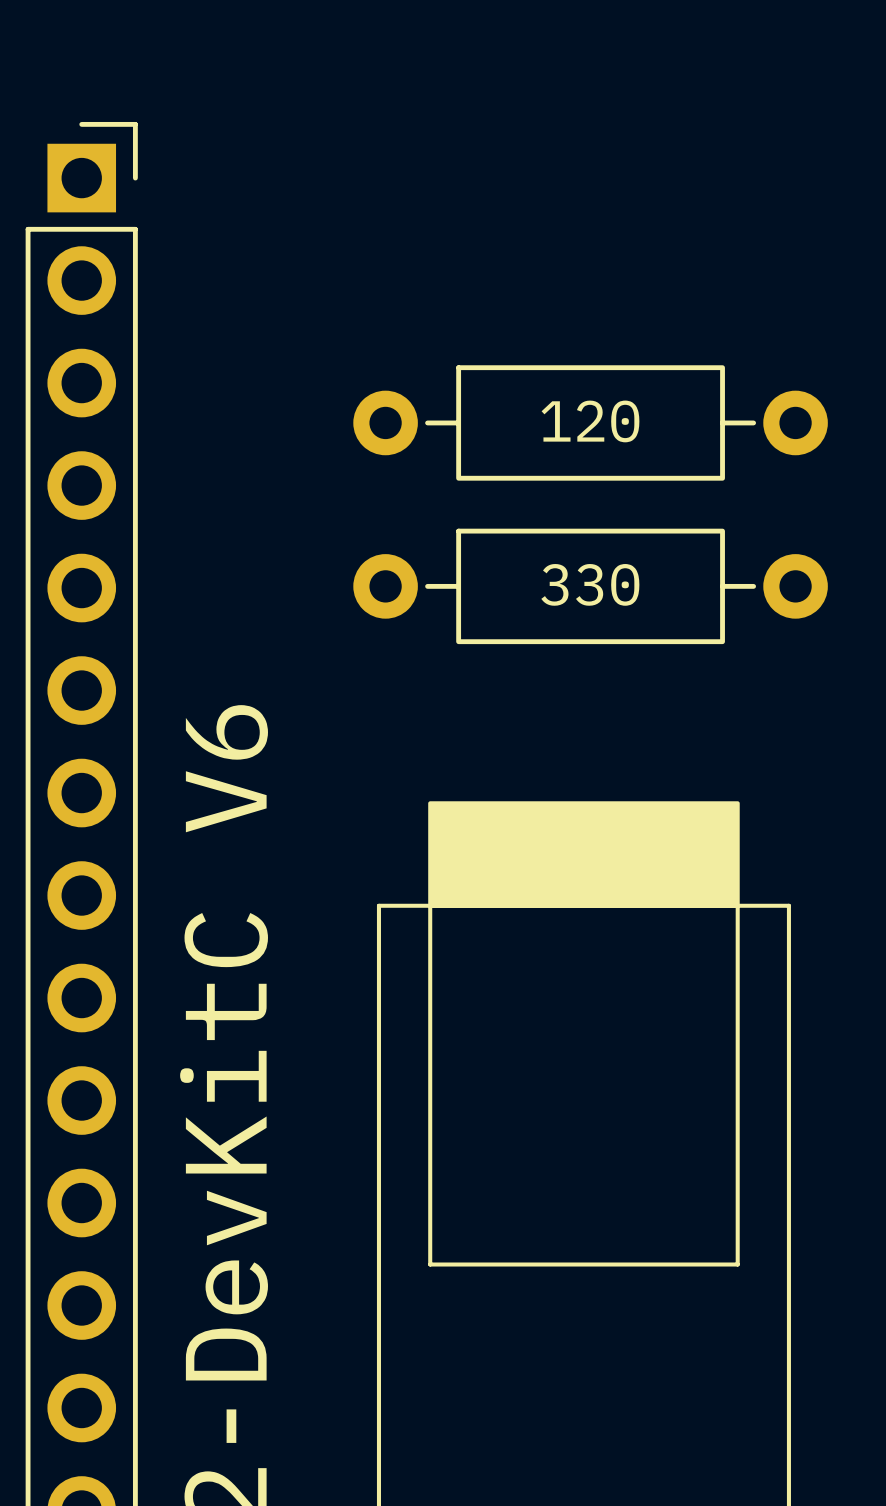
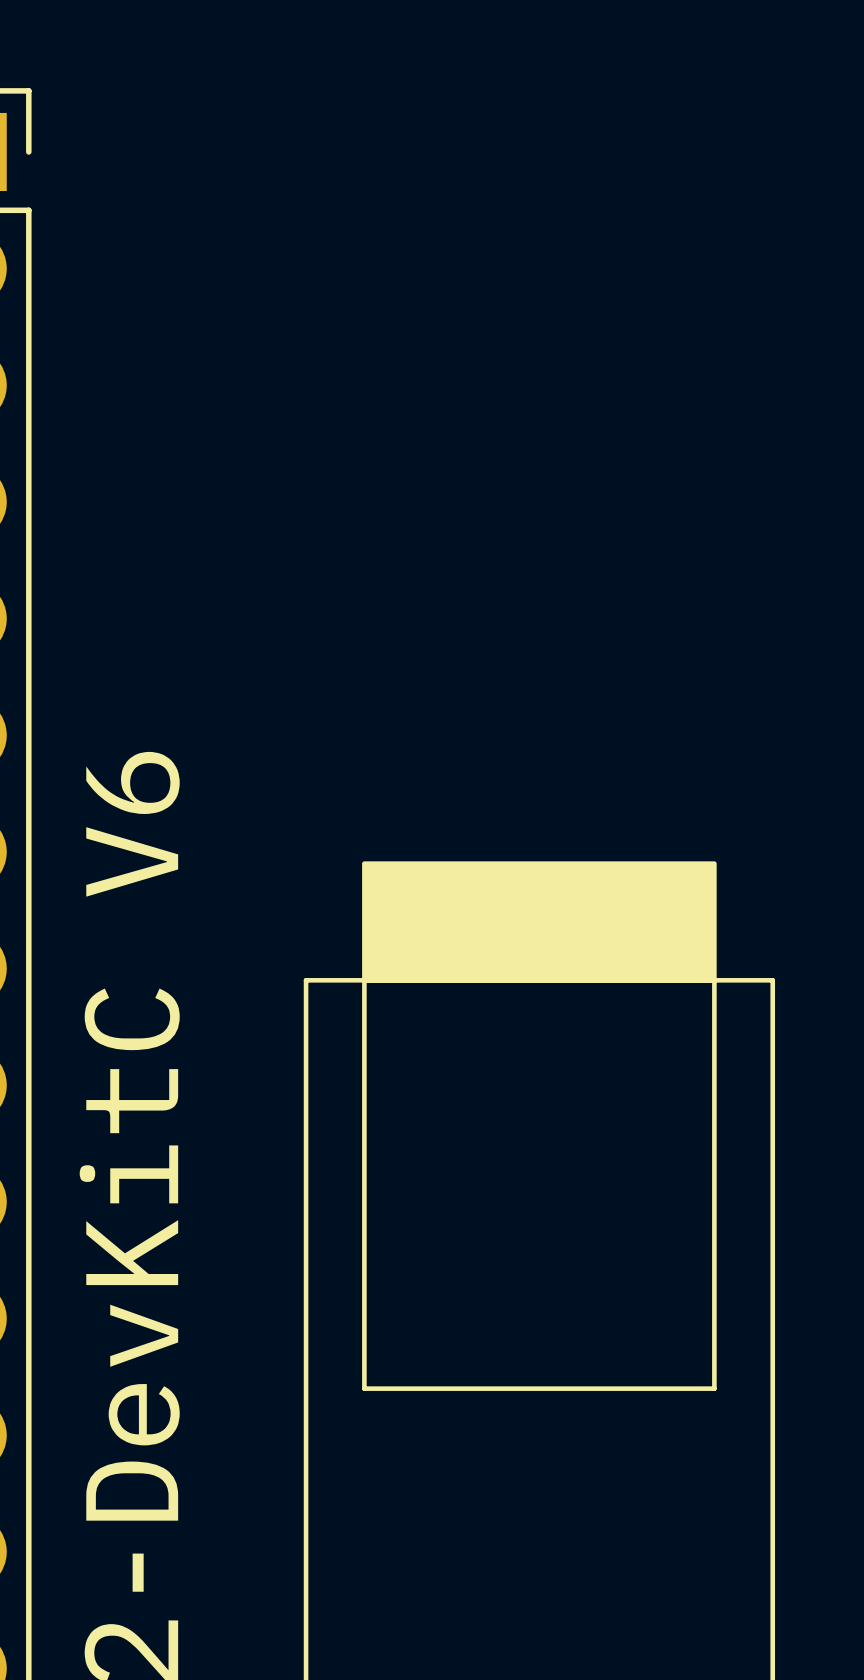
part: 120 (590, 422) -> none
part: 330 (590, 586) -> none

